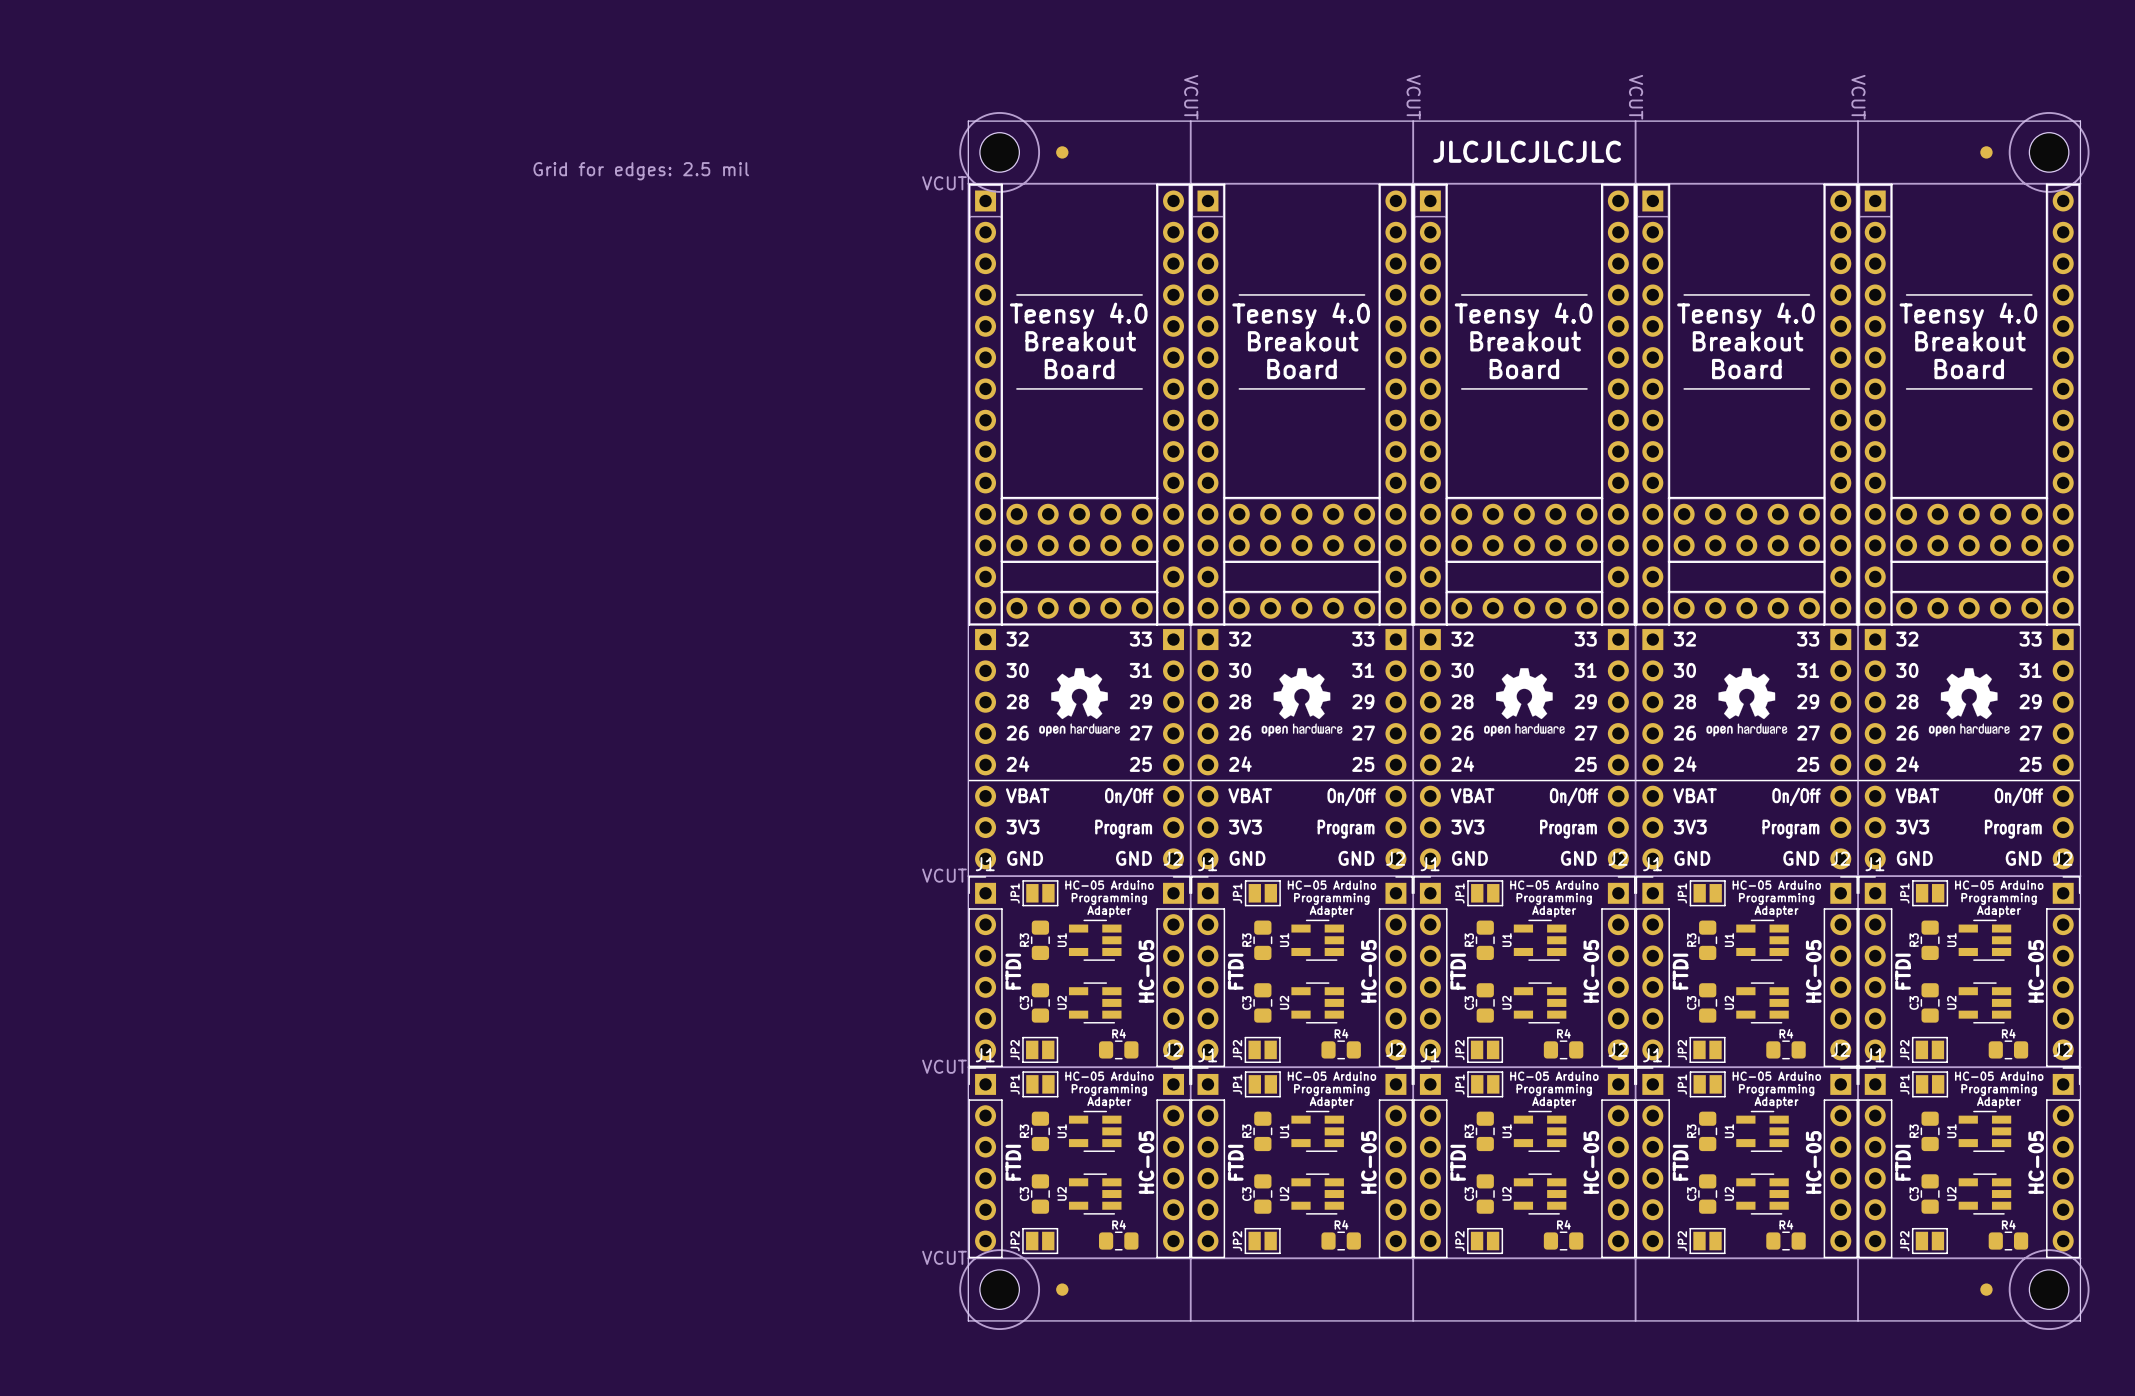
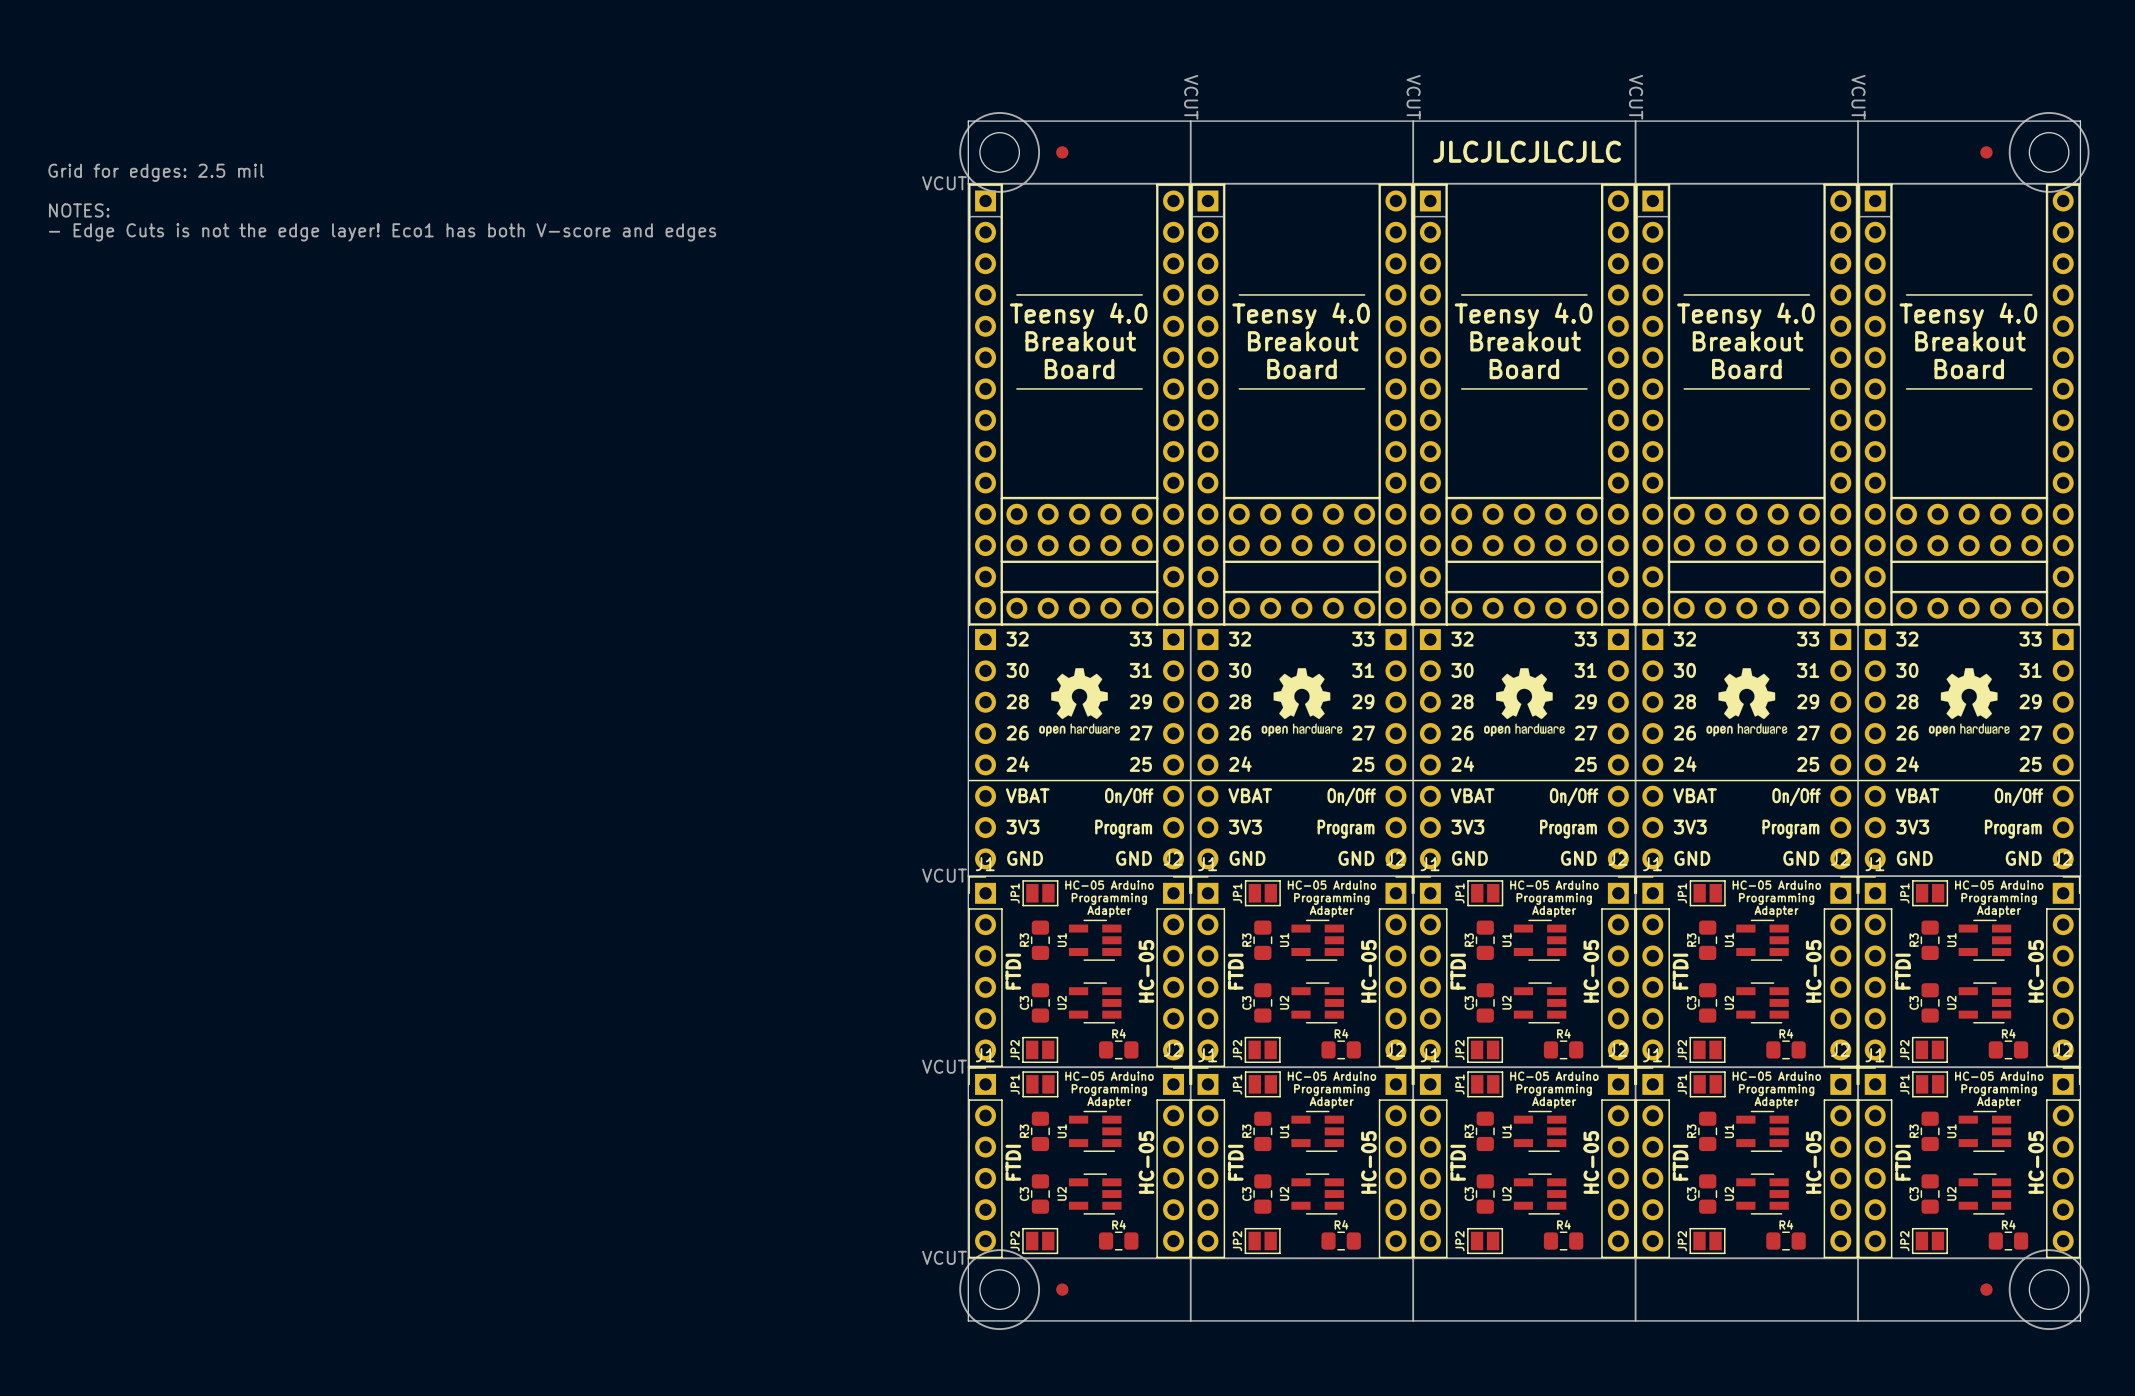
text: Grid for edges: 2.5 mil (641, 171) -> none
text: none -> Grid for edges: 2.5 mil (156, 172)
text: none -> NOTES: (79, 210)
text: none -> - Edge Cuts is not the edge layer! Eco1 has both V-score and edges (382, 232)

